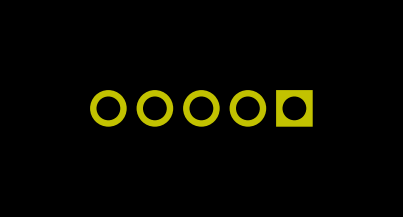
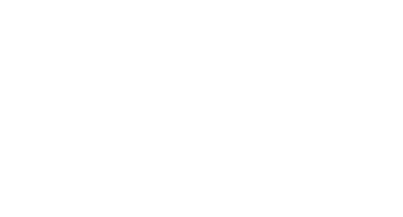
part: (201, 108) -> none

